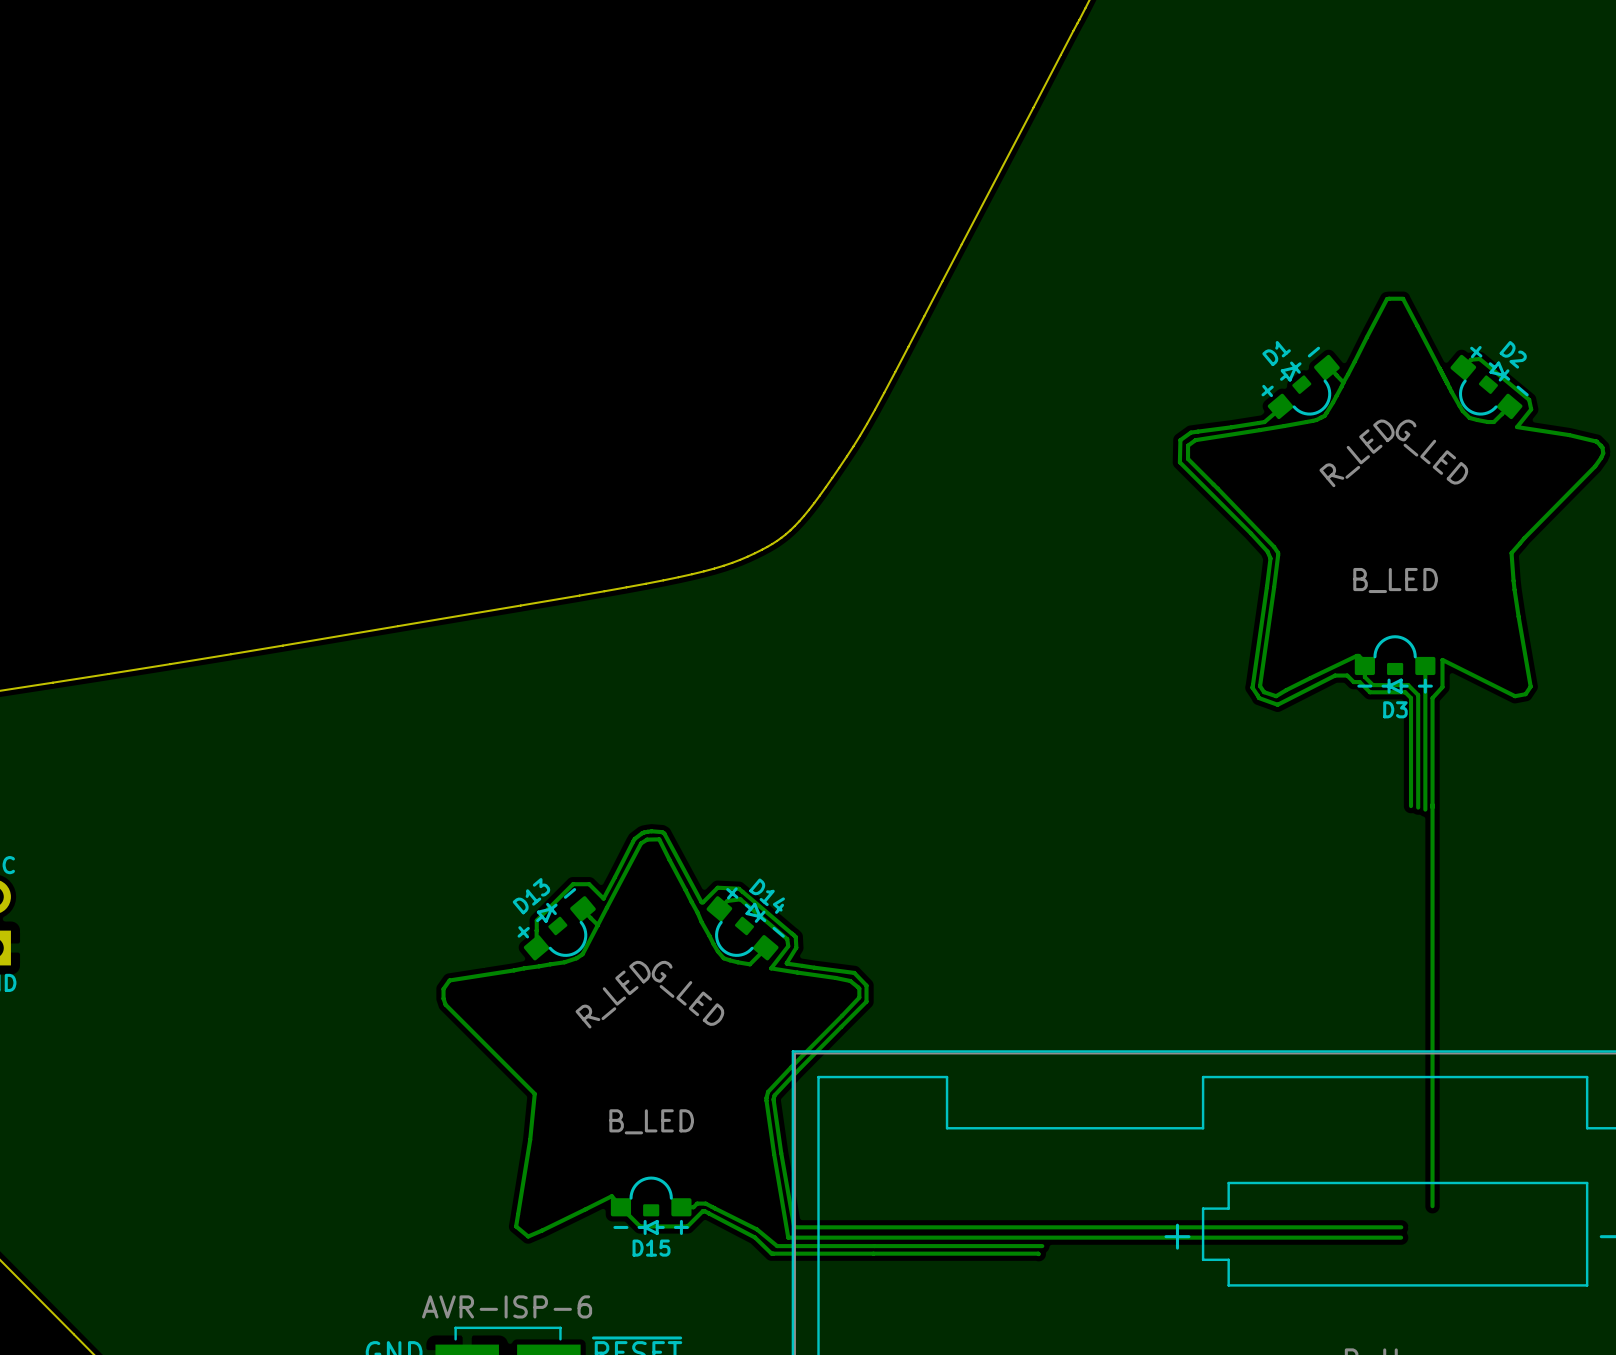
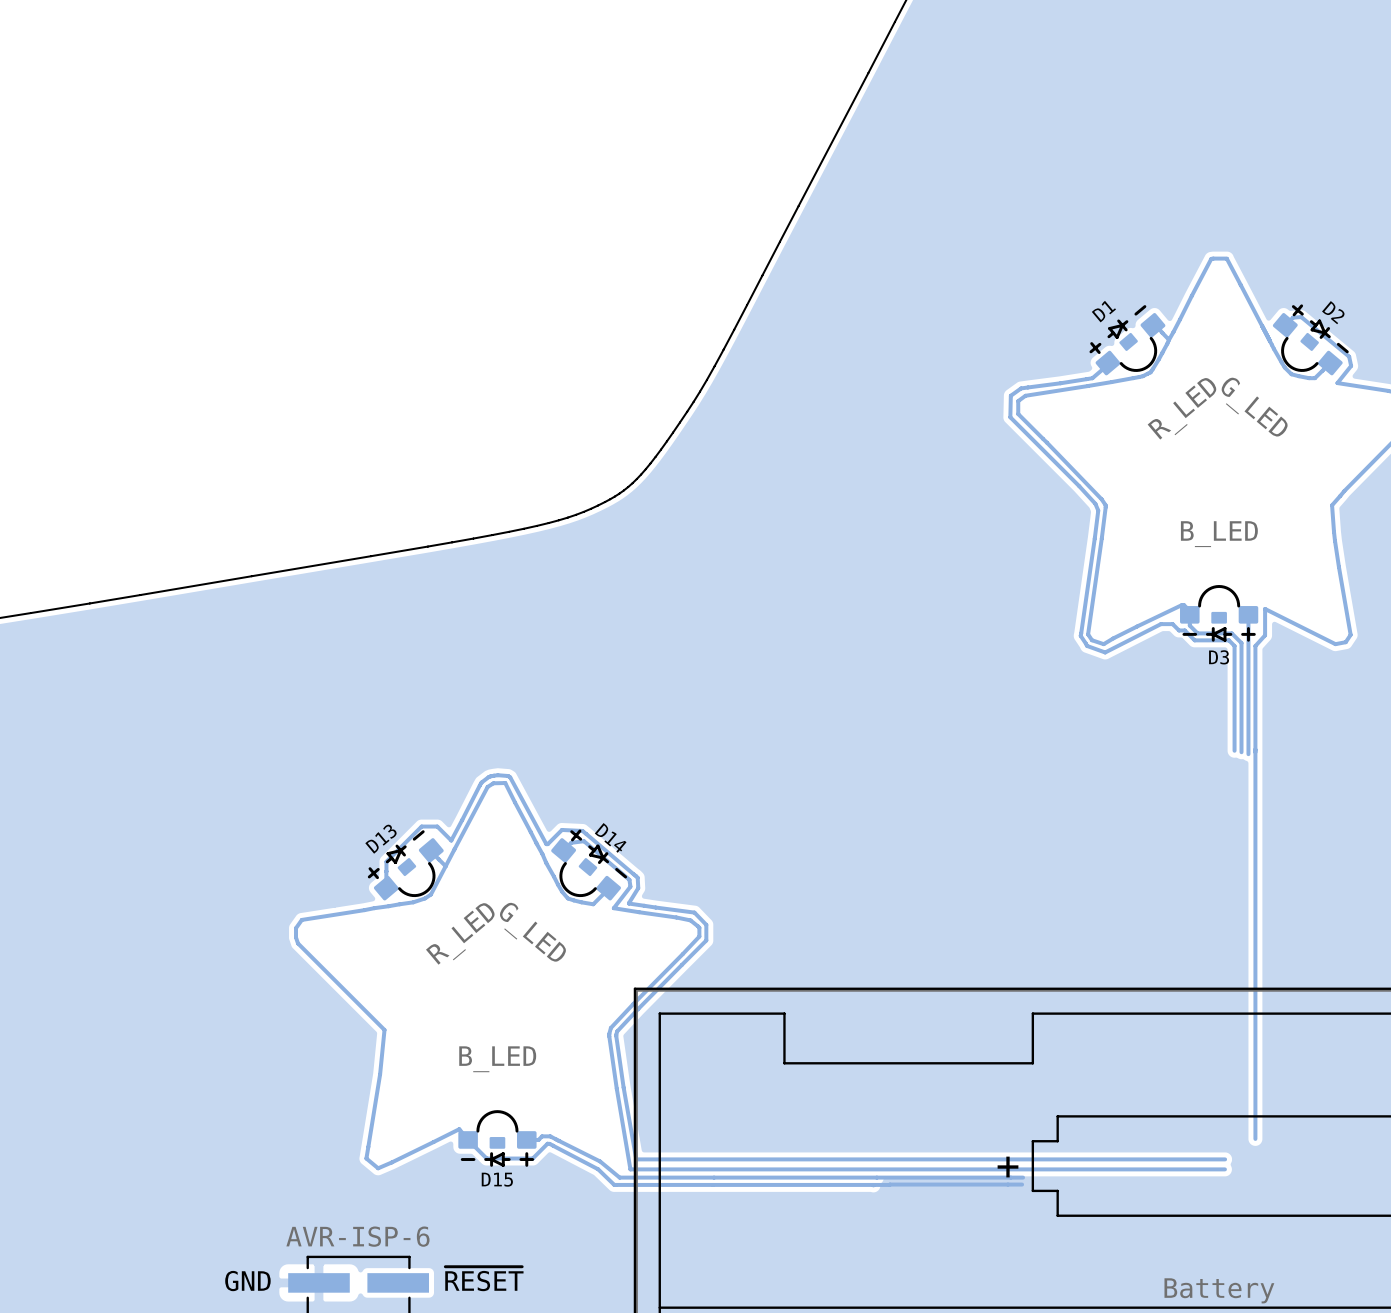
track: none -> (1023, 1177) (876, 1177)
track: none -> (1022, 1184) (872, 1184)

